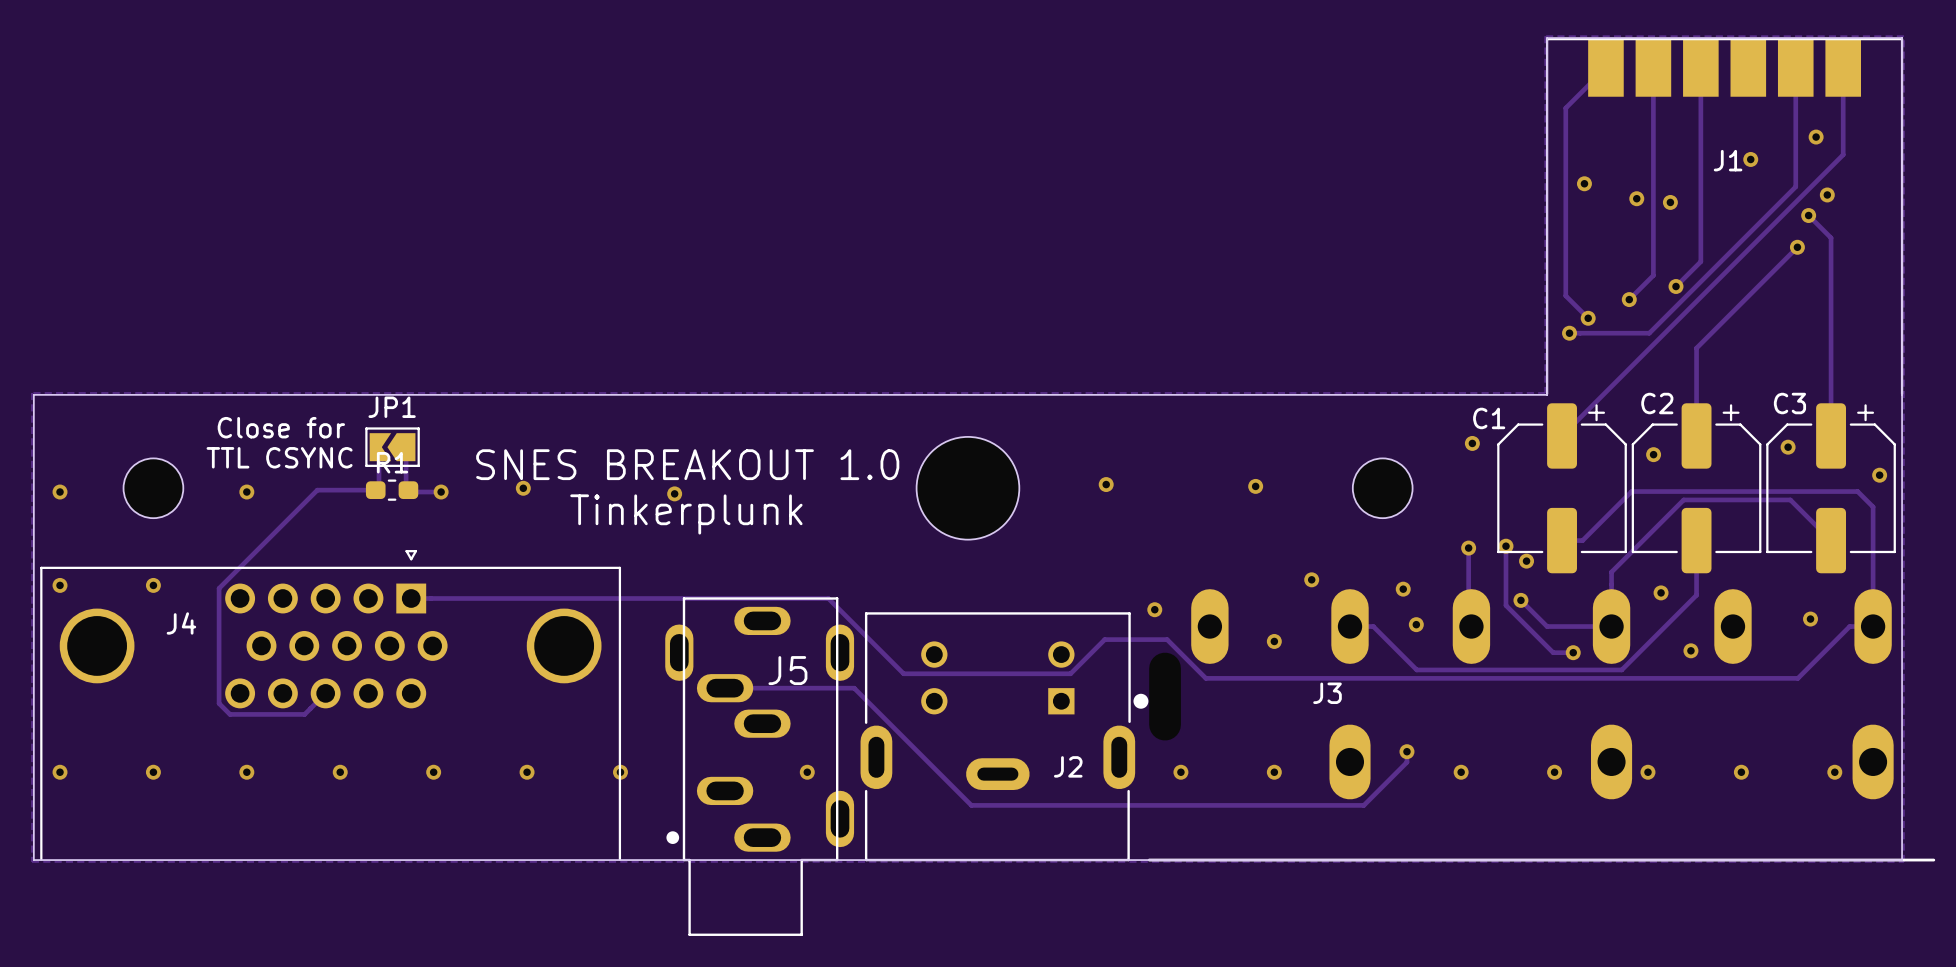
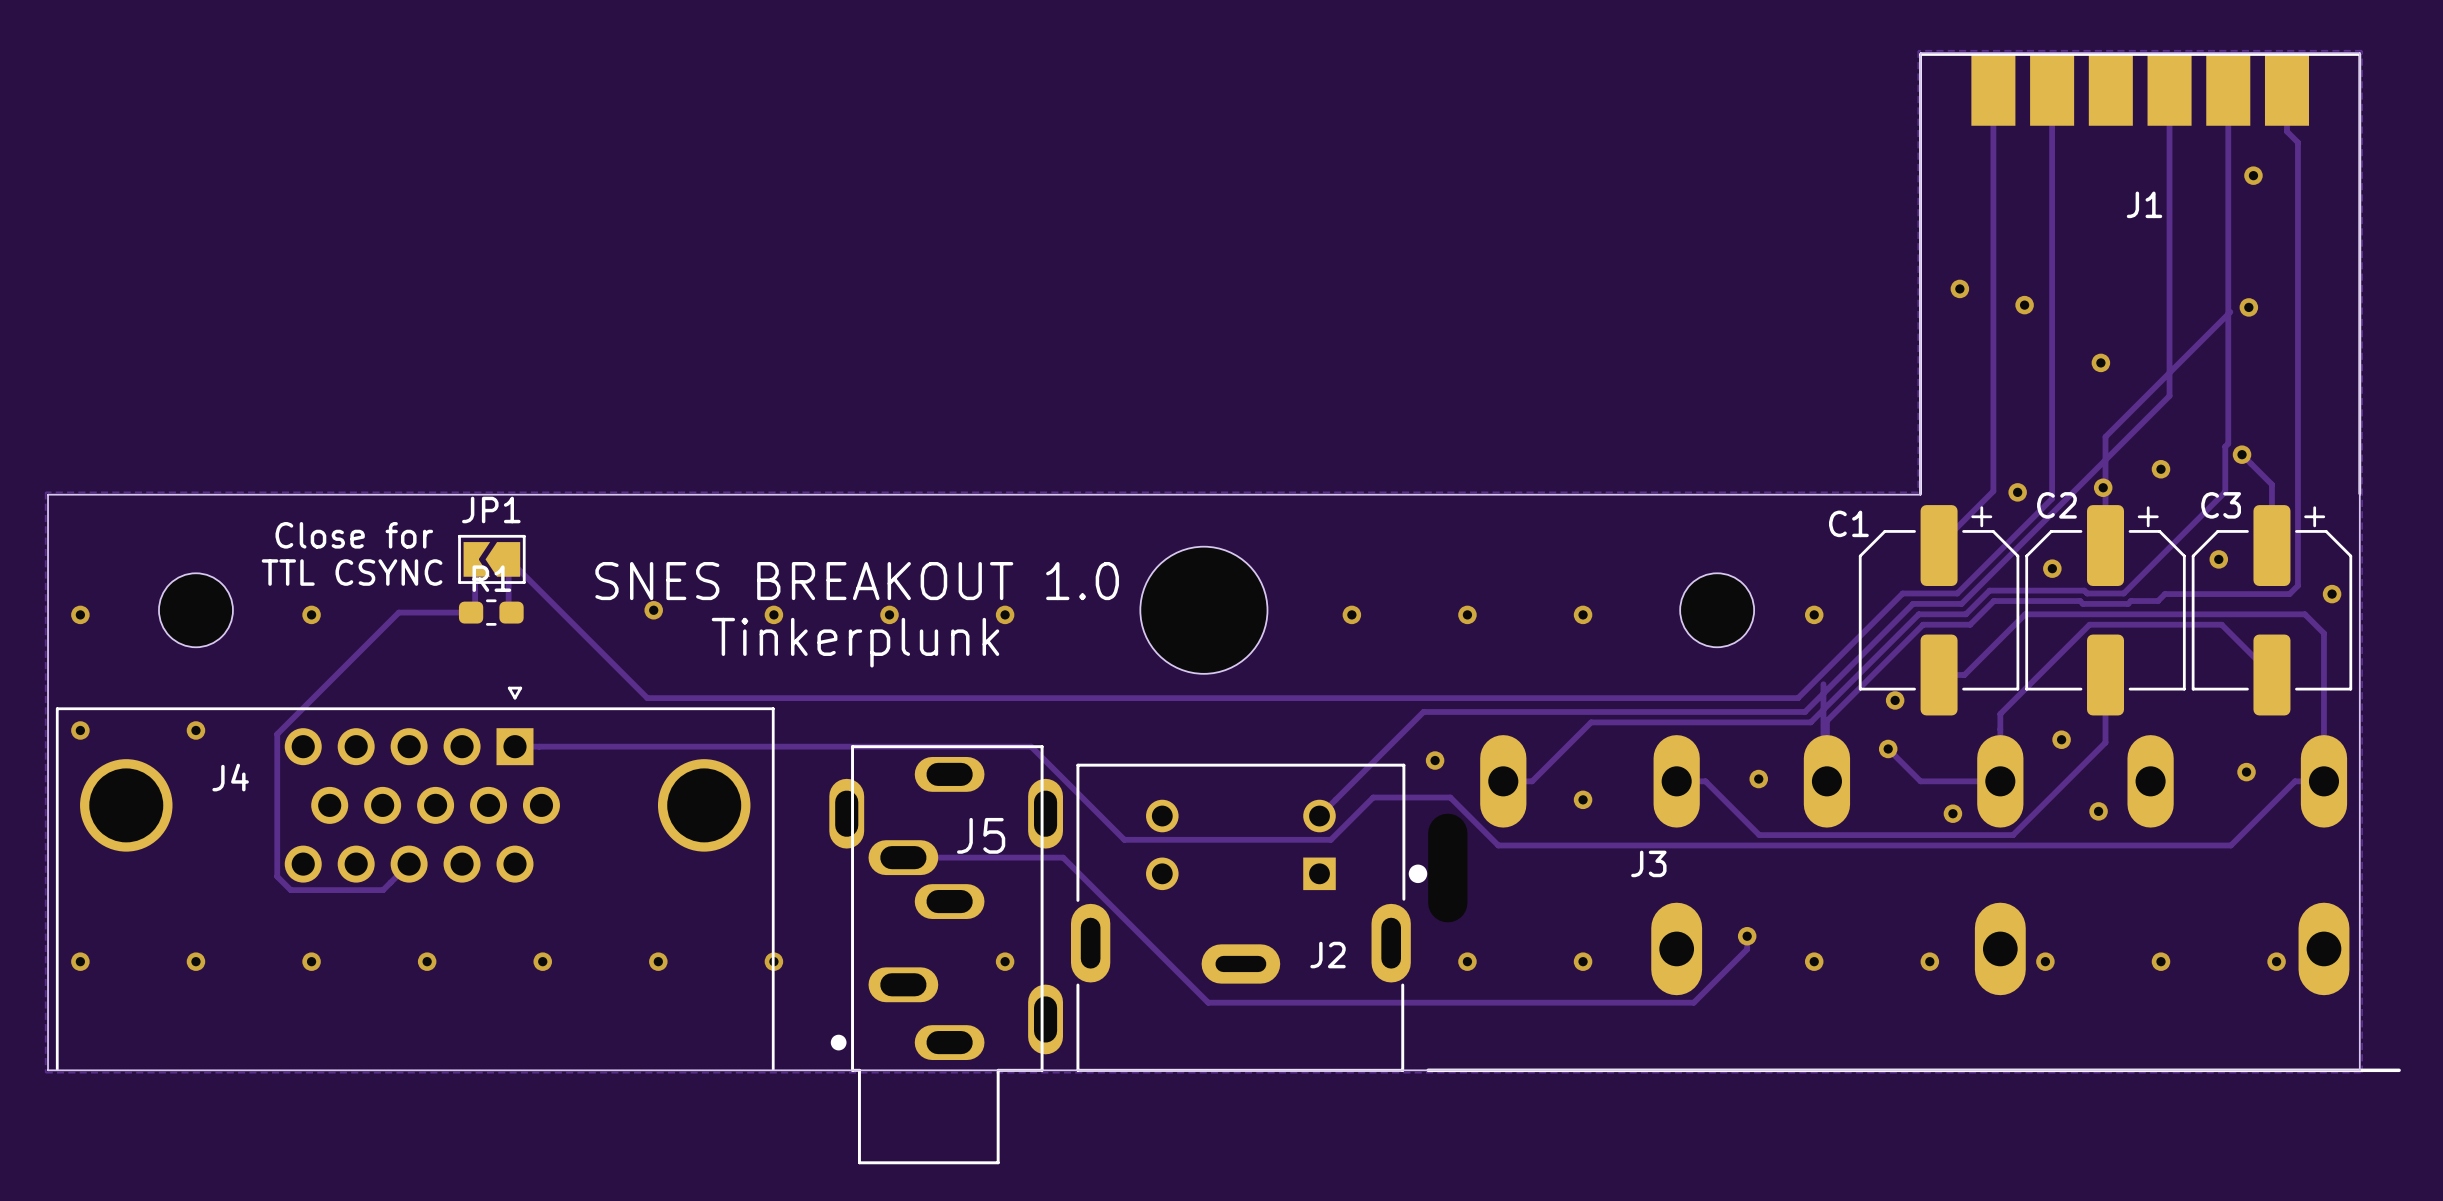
track: (1605, 67) (1565, 108) (1565, 295) (1588, 318) -> (1993, 90) (1993, 491)
track: (1700, 67) (1700, 261) (1676, 286) -> none
track: none -> (2169, 90) (2169, 395) (1961, 603) (1913, 603) (1804, 711) (1423, 711) (1319, 816)
track: (1843, 101) (1843, 154) (1605, 392) -> (2286, 131) (2297, 142) (2297, 585) (2289, 594) (2164, 594) (2158, 601) (2130, 601) (2128, 603) (2082, 603) (2080, 601) (1993, 601) (1970, 624) (1923, 624) (1826, 720) (1826, 781)
via: (1750, 159) -> none
via: (1584, 183) -> none
track: (1795, 186) (1649, 333) (1569, 333) -> (2228, 237) (2228, 443) (2225, 446) (2225, 491) (2123, 593) (2087, 593) (2084, 590) (1989, 590) (1965, 614) (1918, 614) (1810, 722) (1591, 722) (1532, 781) (1503, 781)
via: (1827, 194) -> none
via: (1636, 198) -> none
via: (1670, 202) -> none
track: (1808, 215) (1831, 237) (1831, 386) -> (2242, 454) (2271, 484)
via: (1808, 215) -> none
via: none -> (1959, 288)
via: none -> (2024, 305)
via position: (1797, 247) -> (2248, 307)
track: (1653, 275) (1629, 299) -> (2052, 346) (2052, 498) (1957, 593) (1902, 593) (1798, 698) (647, 698) (508, 559)
via position: (1676, 286) -> (2100, 362)
via: (1629, 299) -> none
via: (1588, 318) -> none
via: (1569, 333) -> none
via: none -> (2242, 454)
via: none -> (2160, 469)
via: none -> (2103, 487)
via: none -> (2017, 492)
via: (1472, 443) -> none
via position: (1106, 484) -> (1351, 614)
via position: (1255, 486) -> (1583, 614)
track: (408, 490) (410, 492) (441, 492) -> none
via: (441, 492) -> none
via: none -> (773, 614)
via: none -> (889, 614)
via: none -> (1005, 614)
via: none -> (1467, 614)
via: none -> (1814, 614)
via: (674, 493) -> none
track: (1506, 546) (1506, 605) (1553, 652) (1573, 652) -> none
via: (1506, 546) -> none
via: (1468, 548) -> none
via: (1311, 579) -> none
via: (1403, 589) -> none

